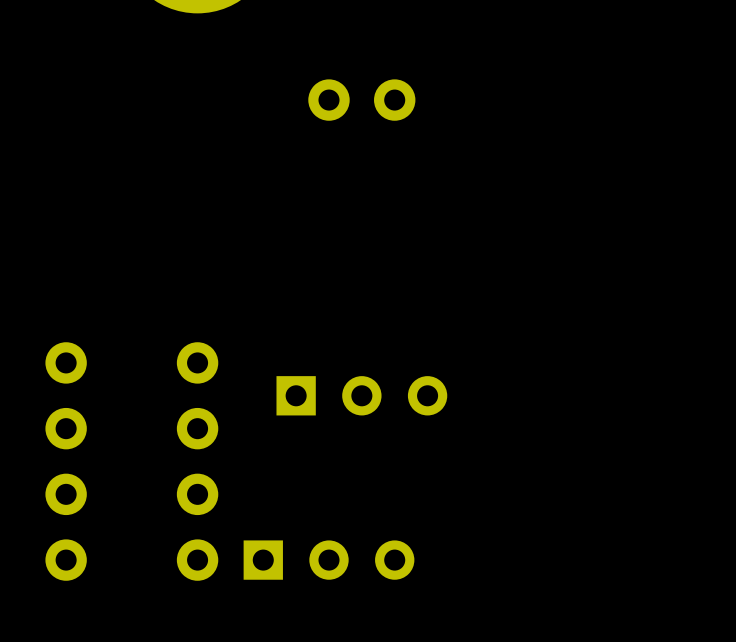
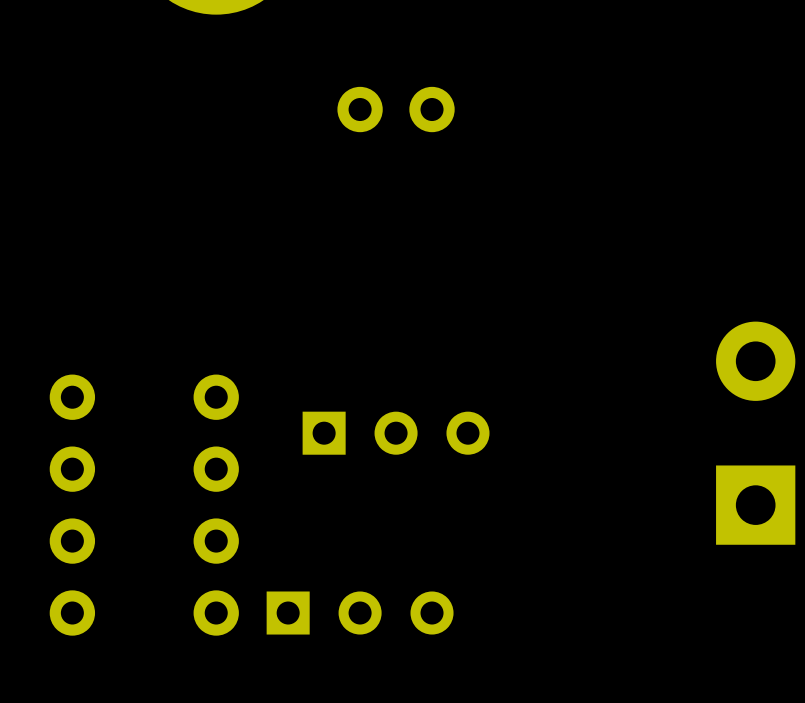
part: none -> (755, 433)

